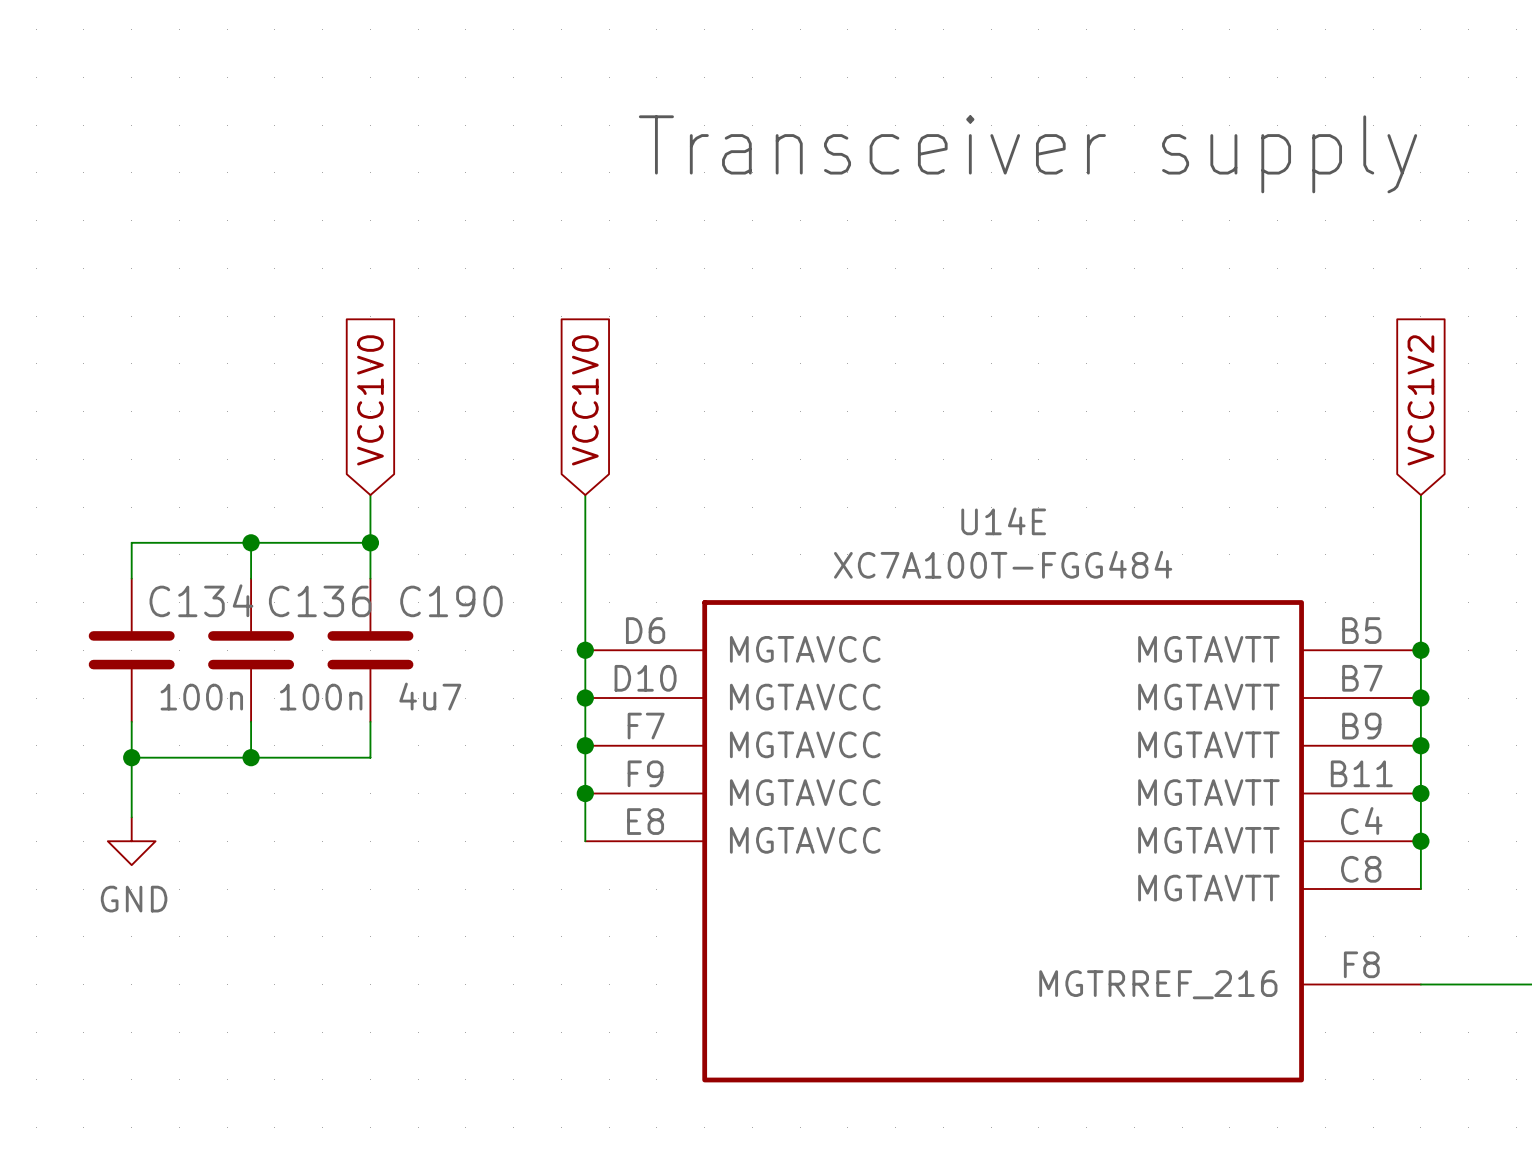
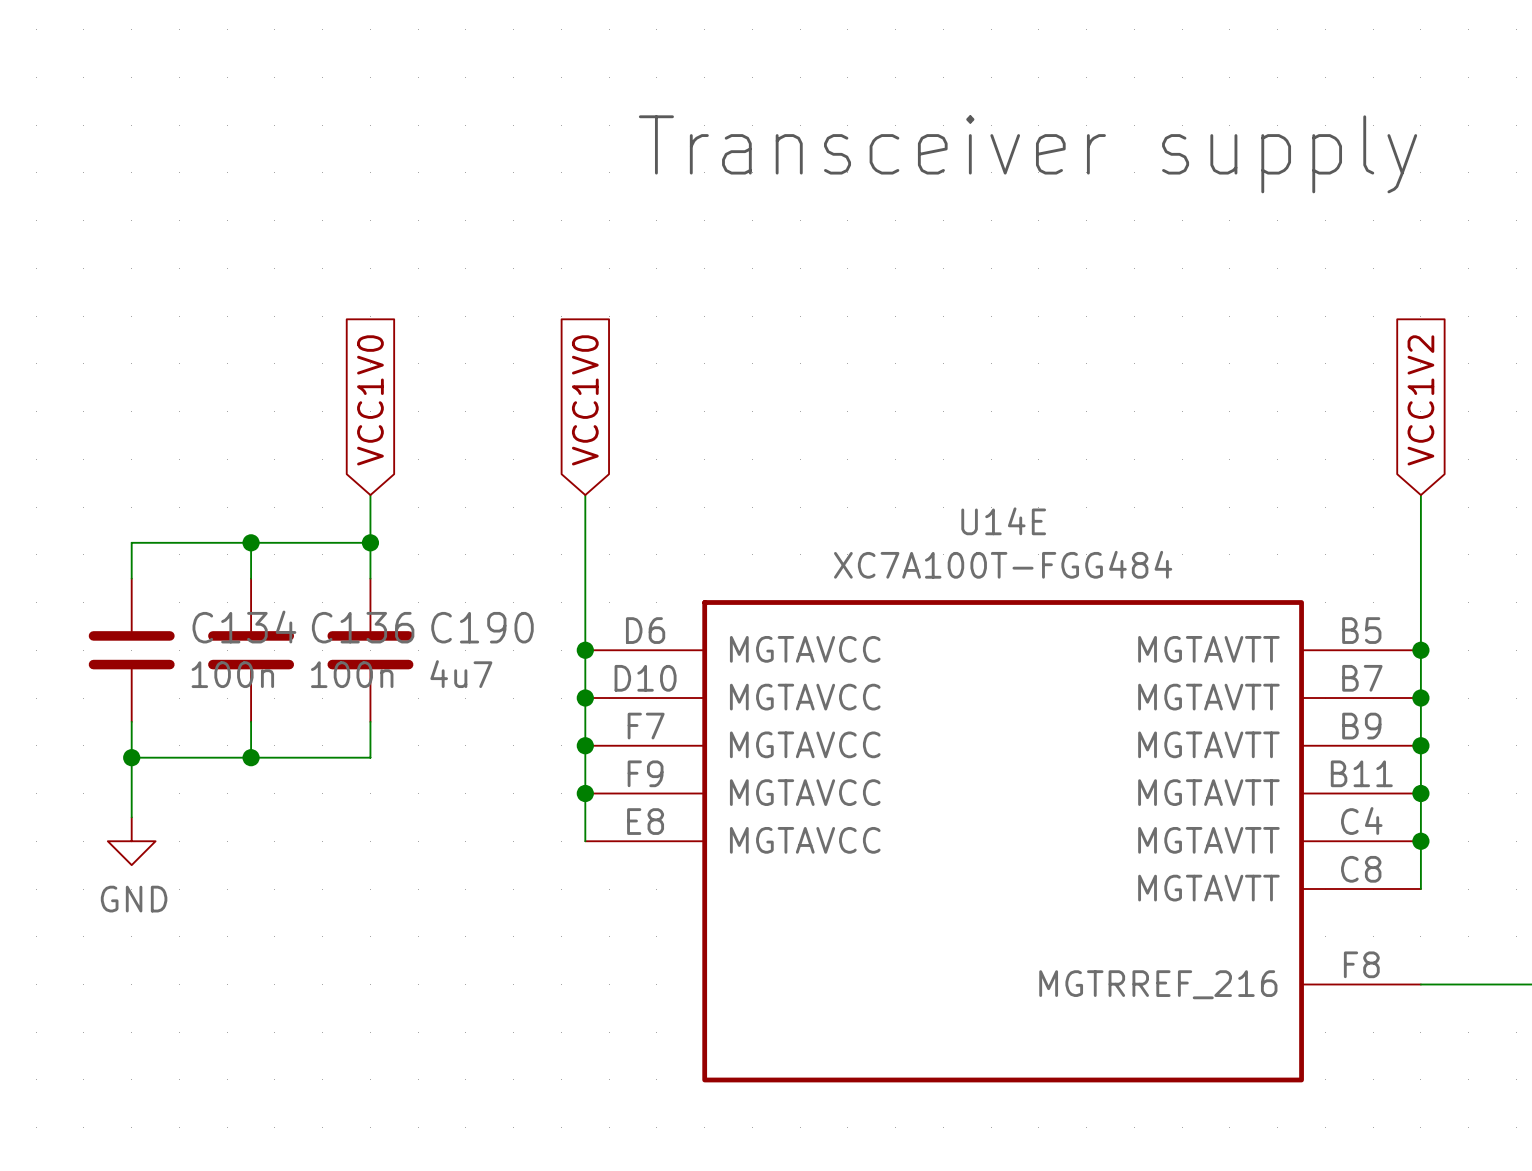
C134 name position: C134 (201, 600) -> C134 (244, 627)
C136 name position: C136 (320, 601) -> C136 (363, 627)
C190 name position: C190 (451, 601) -> C190 (482, 627)
C190 text position: 4u7 (430, 696) -> 4u7 (461, 674)
C134 text position: 100n (201, 697) -> 100n (232, 674)
C136 text position: 100n (321, 697) -> 100n (352, 674)

